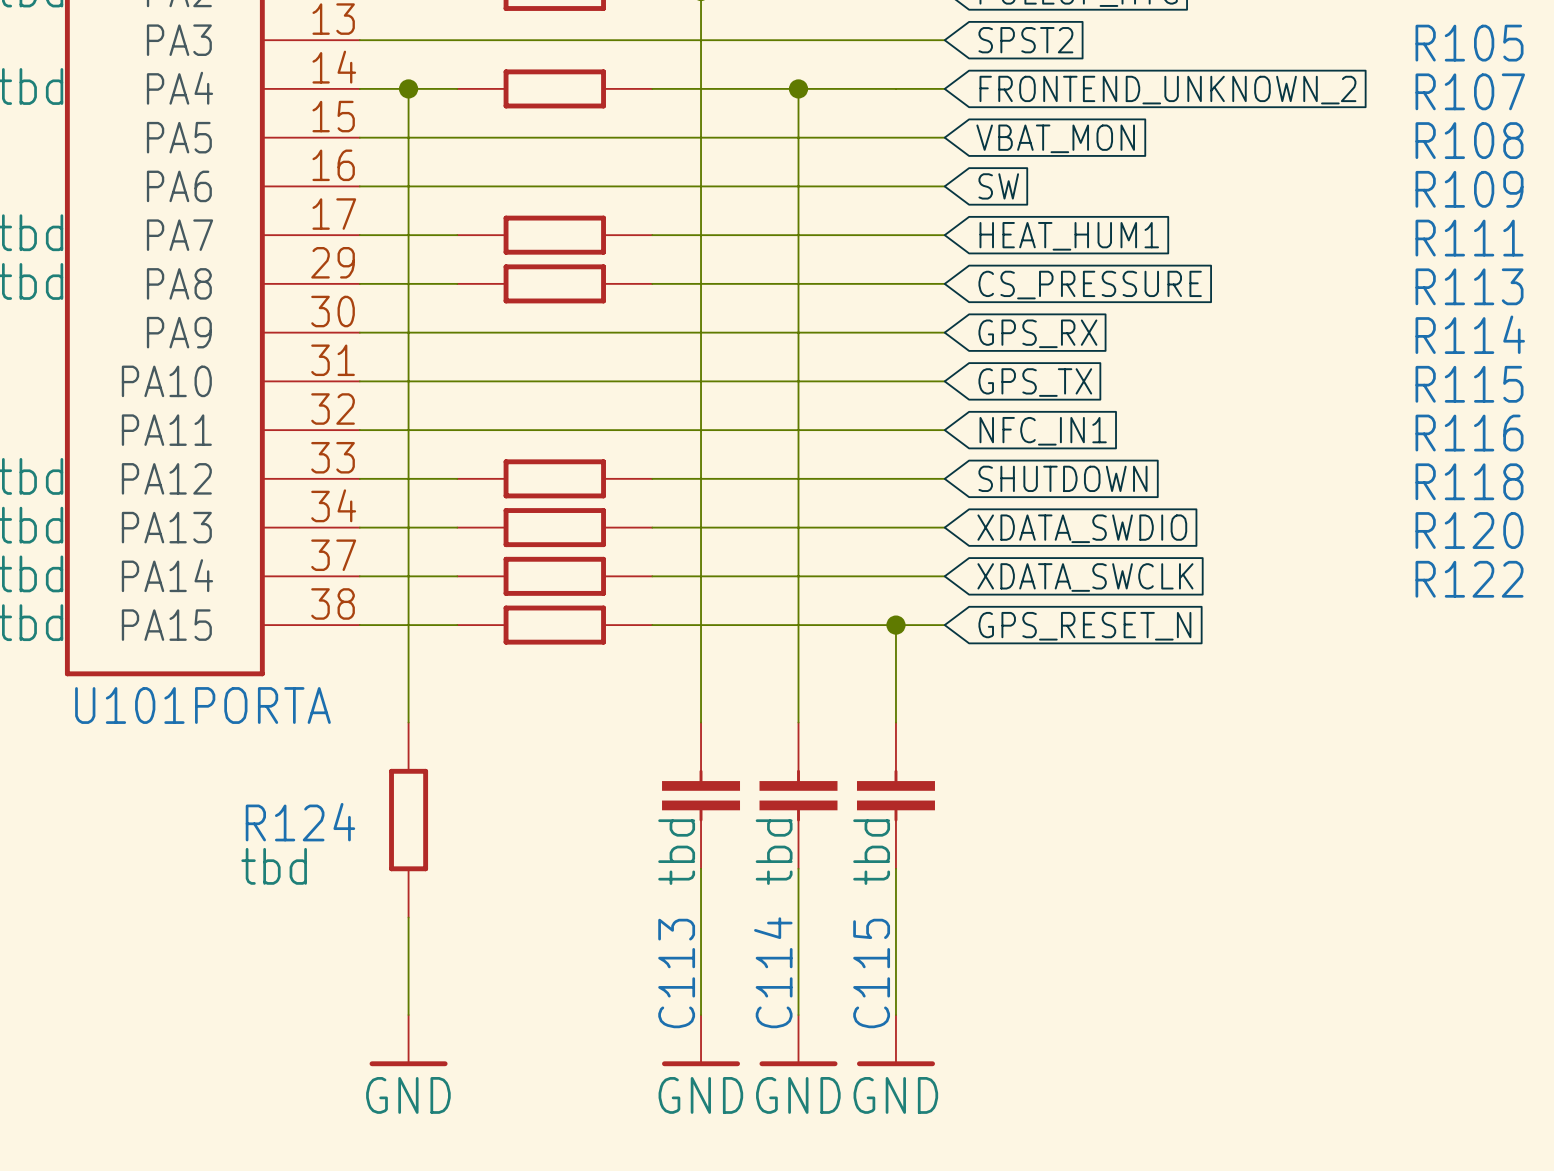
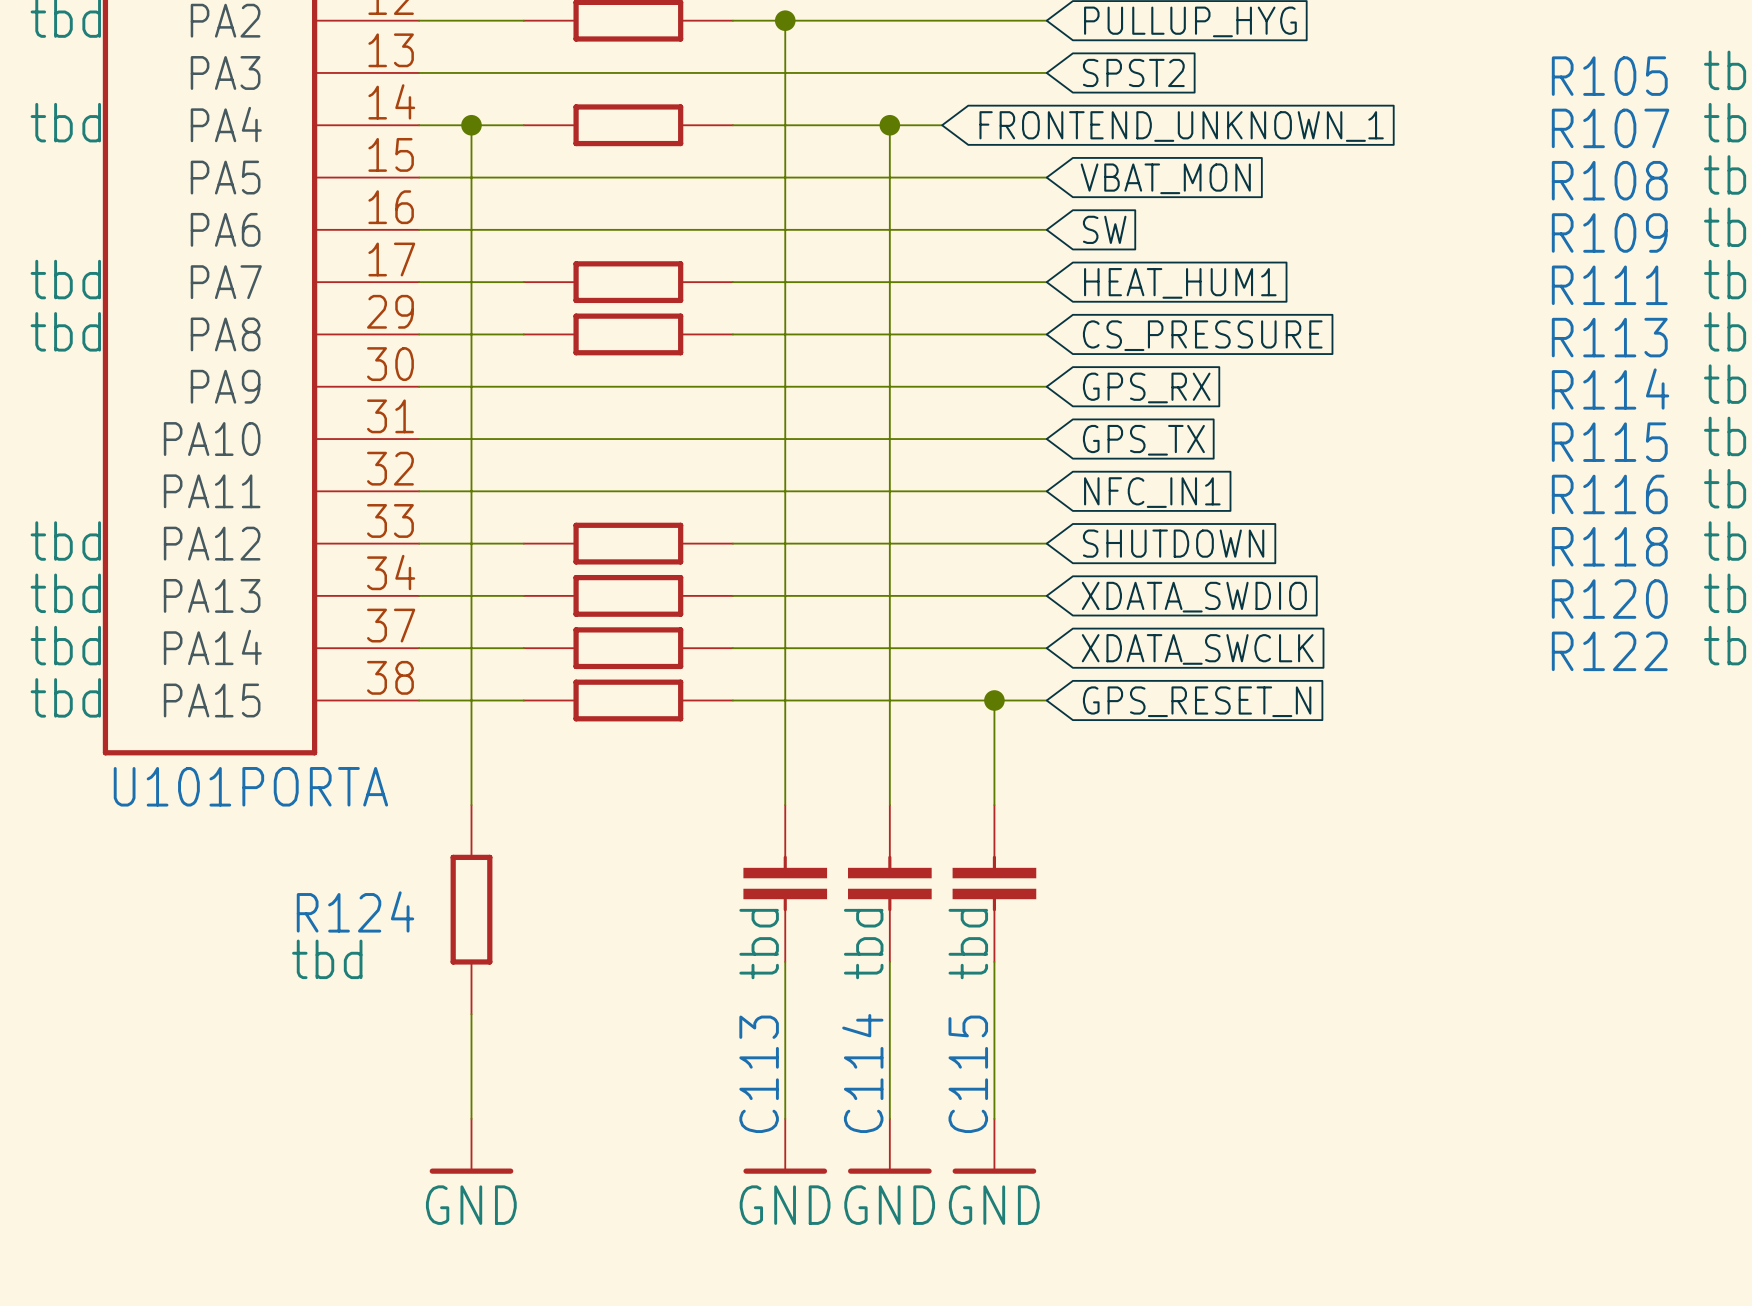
wire: (847, 88) (944, 88) -> none
global label: FRONTEND_UNKNOWN_2 (1167, 90) -> FRONTEND_UNKNOWN_1 (1181, 126)

